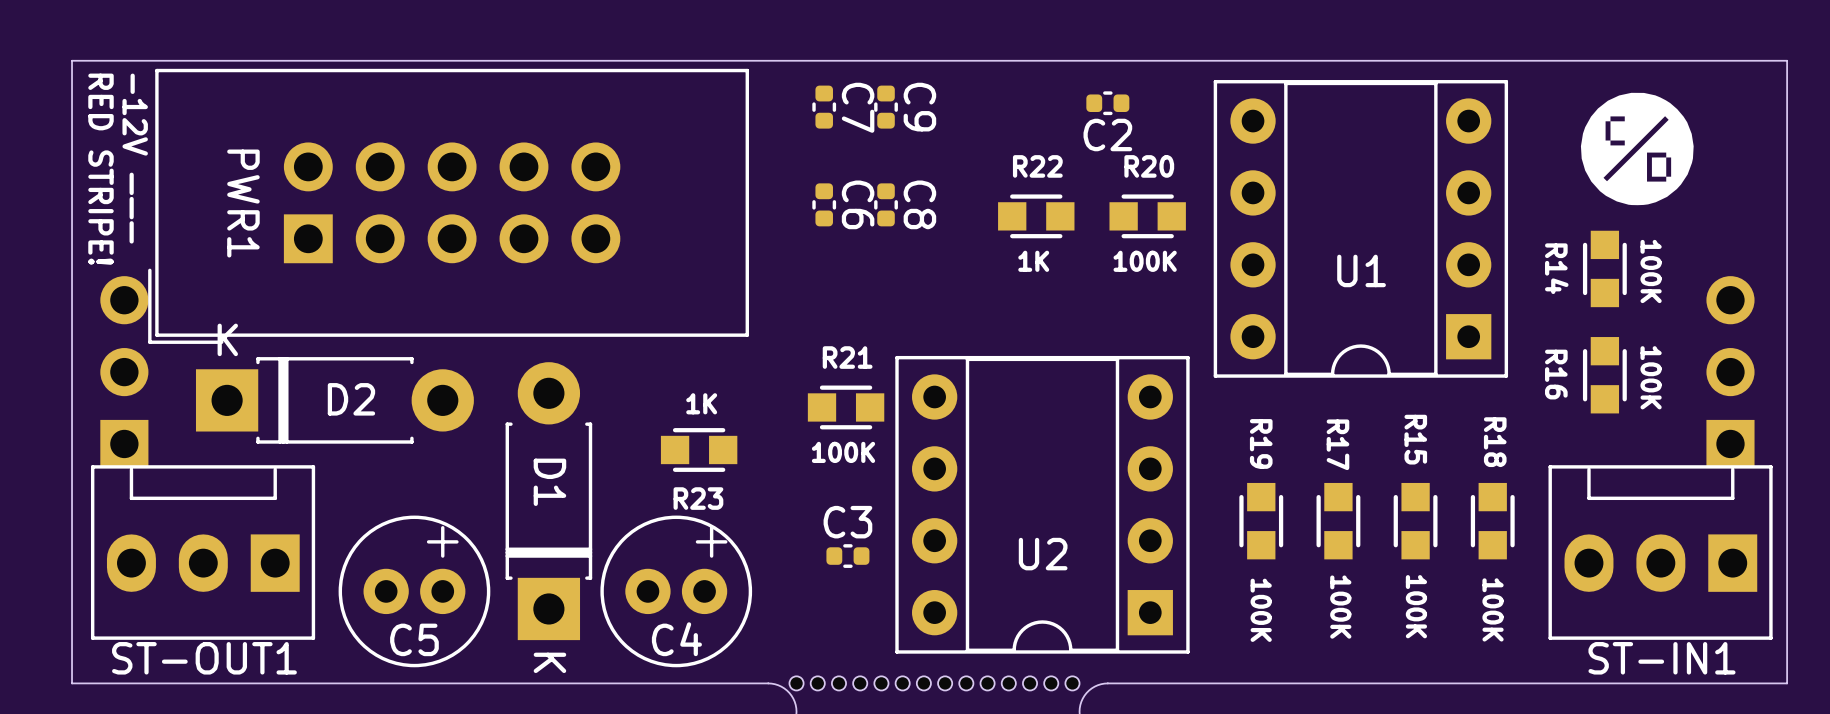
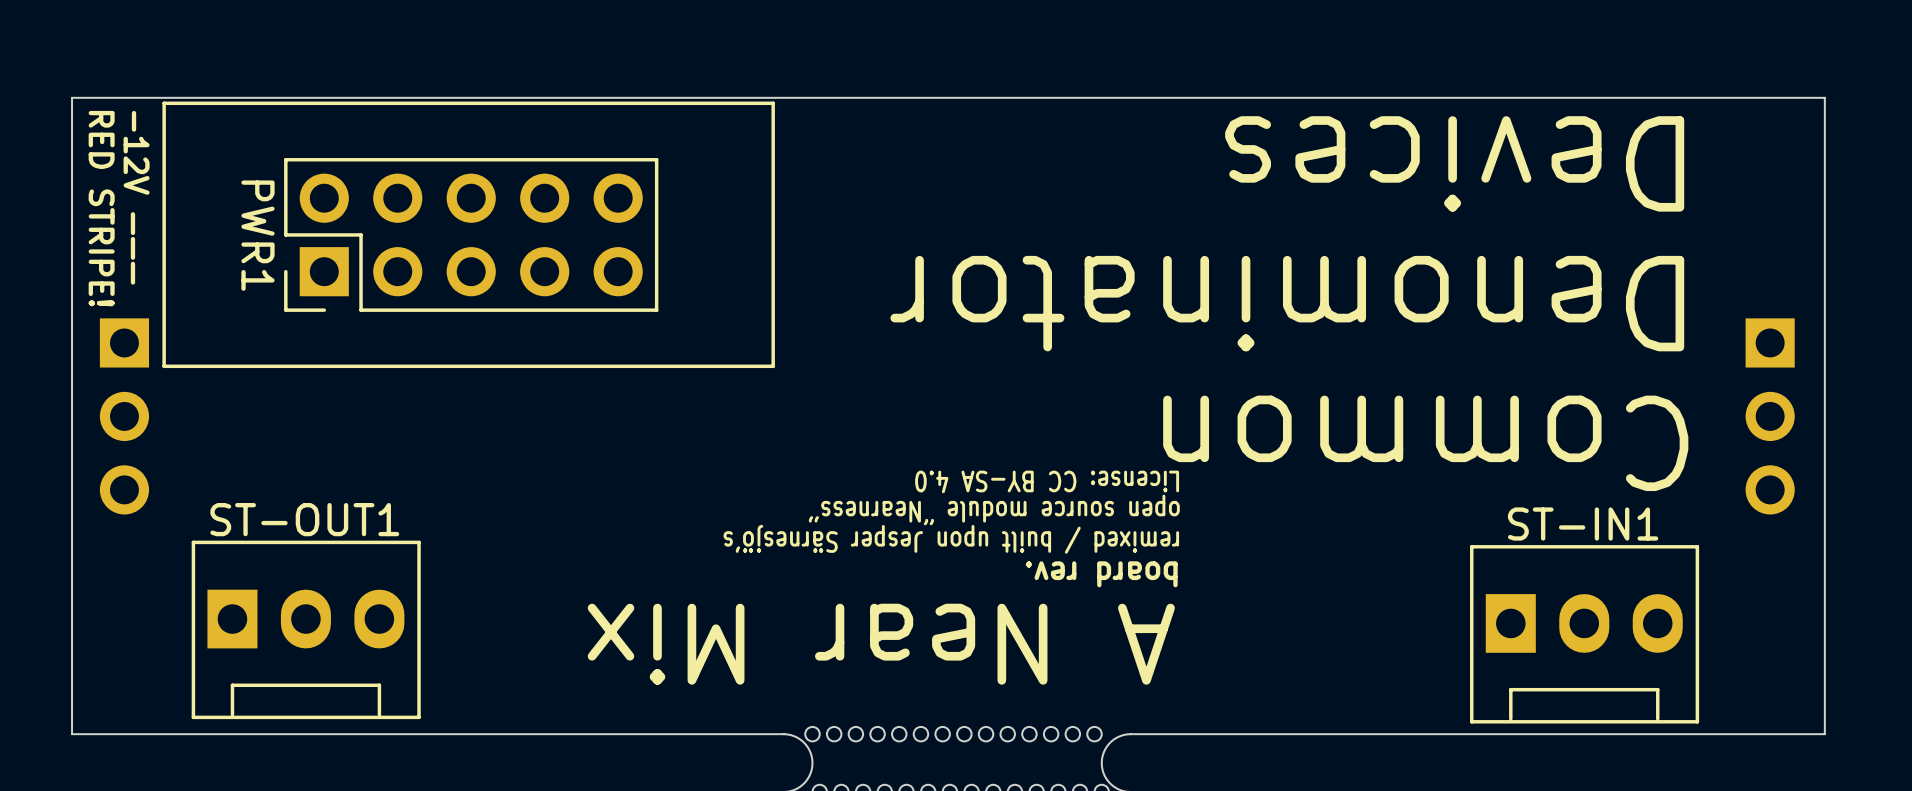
line: none -> (773, 103) (164, 103) (164, 366) (773, 366) (773, 103)
PWR1 footprint: [148, 68, 749, 344] -> [284, 158, 659, 312]
drawing: [1580, 92, 1694, 206] -> none
C2: (1107, 103) -> none
C7: (824, 107) -> none
C9: (886, 107) -> none
text: none -> Devices (1454, 163)
C6: (824, 204) -> none
C8: (886, 204) -> none
R22: 1K (1036, 216) -> none
R20: 100K (1147, 216) -> none
U1: (1360, 228) -> none
text: none -> Denominator (1287, 303)
R14: 100K (1604, 268) -> none
part rotation: 0° (124, 372) -> 180° (124, 416)
part rotation: 0° (1730, 372) -> 180° (1770, 416)
R16: 100K (1604, 375) -> none
text: none -> Common (1425, 443)
D2: (334, 400) -> none
R21: 100K (846, 407) -> none
text: none -> License: CC BY-SA 4.0 (1047, 481)
R23: 1K (699, 449) -> none
text: none -> open source module “Nearness” (994, 509)
text: none -> remixed / built upon Jesper Särnesjö’s (951, 539)
D1: (548, 501) -> none
U2: (1042, 504) -> none
R19: 100K (1261, 521) -> none
R17: 100K (1338, 521) -> none
R15: 100K (1415, 521) -> none
R18: 100K (1492, 521) -> none
text: none -> board rev. (1101, 574)
line: (442, 527) (442, 556) -> none
line: (711, 527) (711, 556) -> none
line: (456, 541) (428, 541) -> none
line: (725, 541) (697, 541) -> none
ST-OUT1 rotation: 0° (203, 552) -> 180° (306, 629)
ST-IN1 rotation: 0° (1660, 552) -> 180° (1584, 634)
C3: (847, 556) -> none
C5: (414, 591) -> none
C4: (676, 591) -> none
text: none -> A Near Mix (881, 644)

